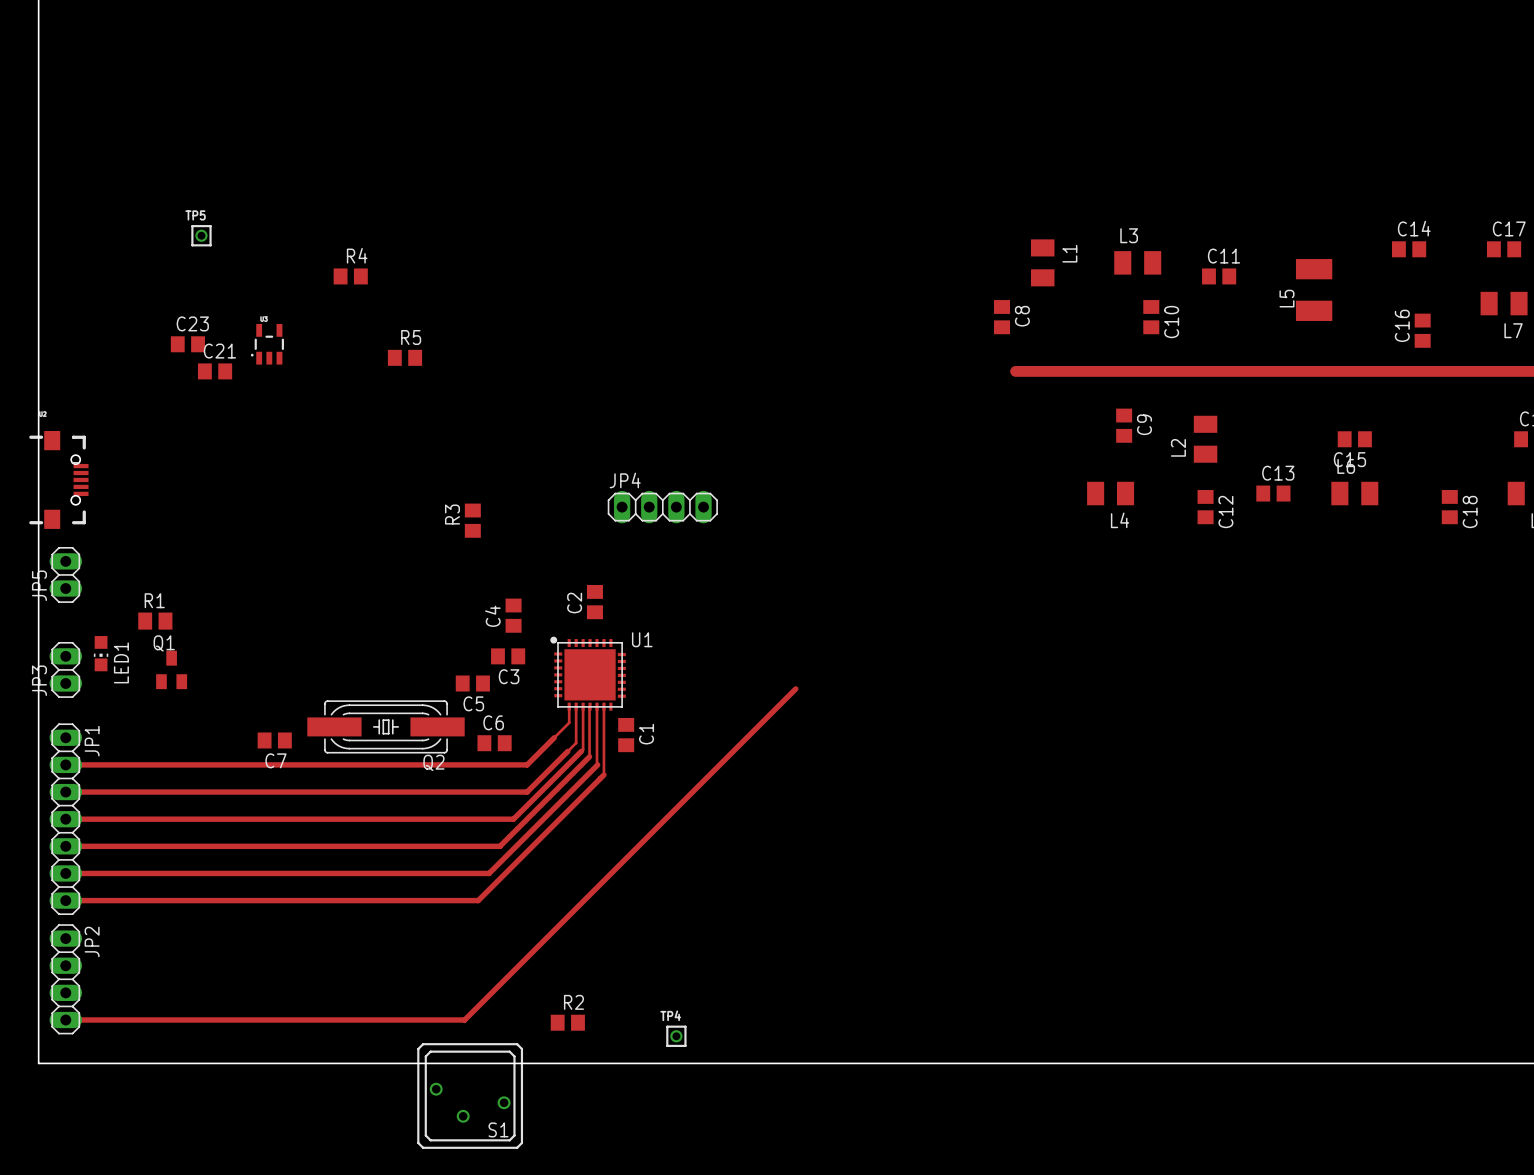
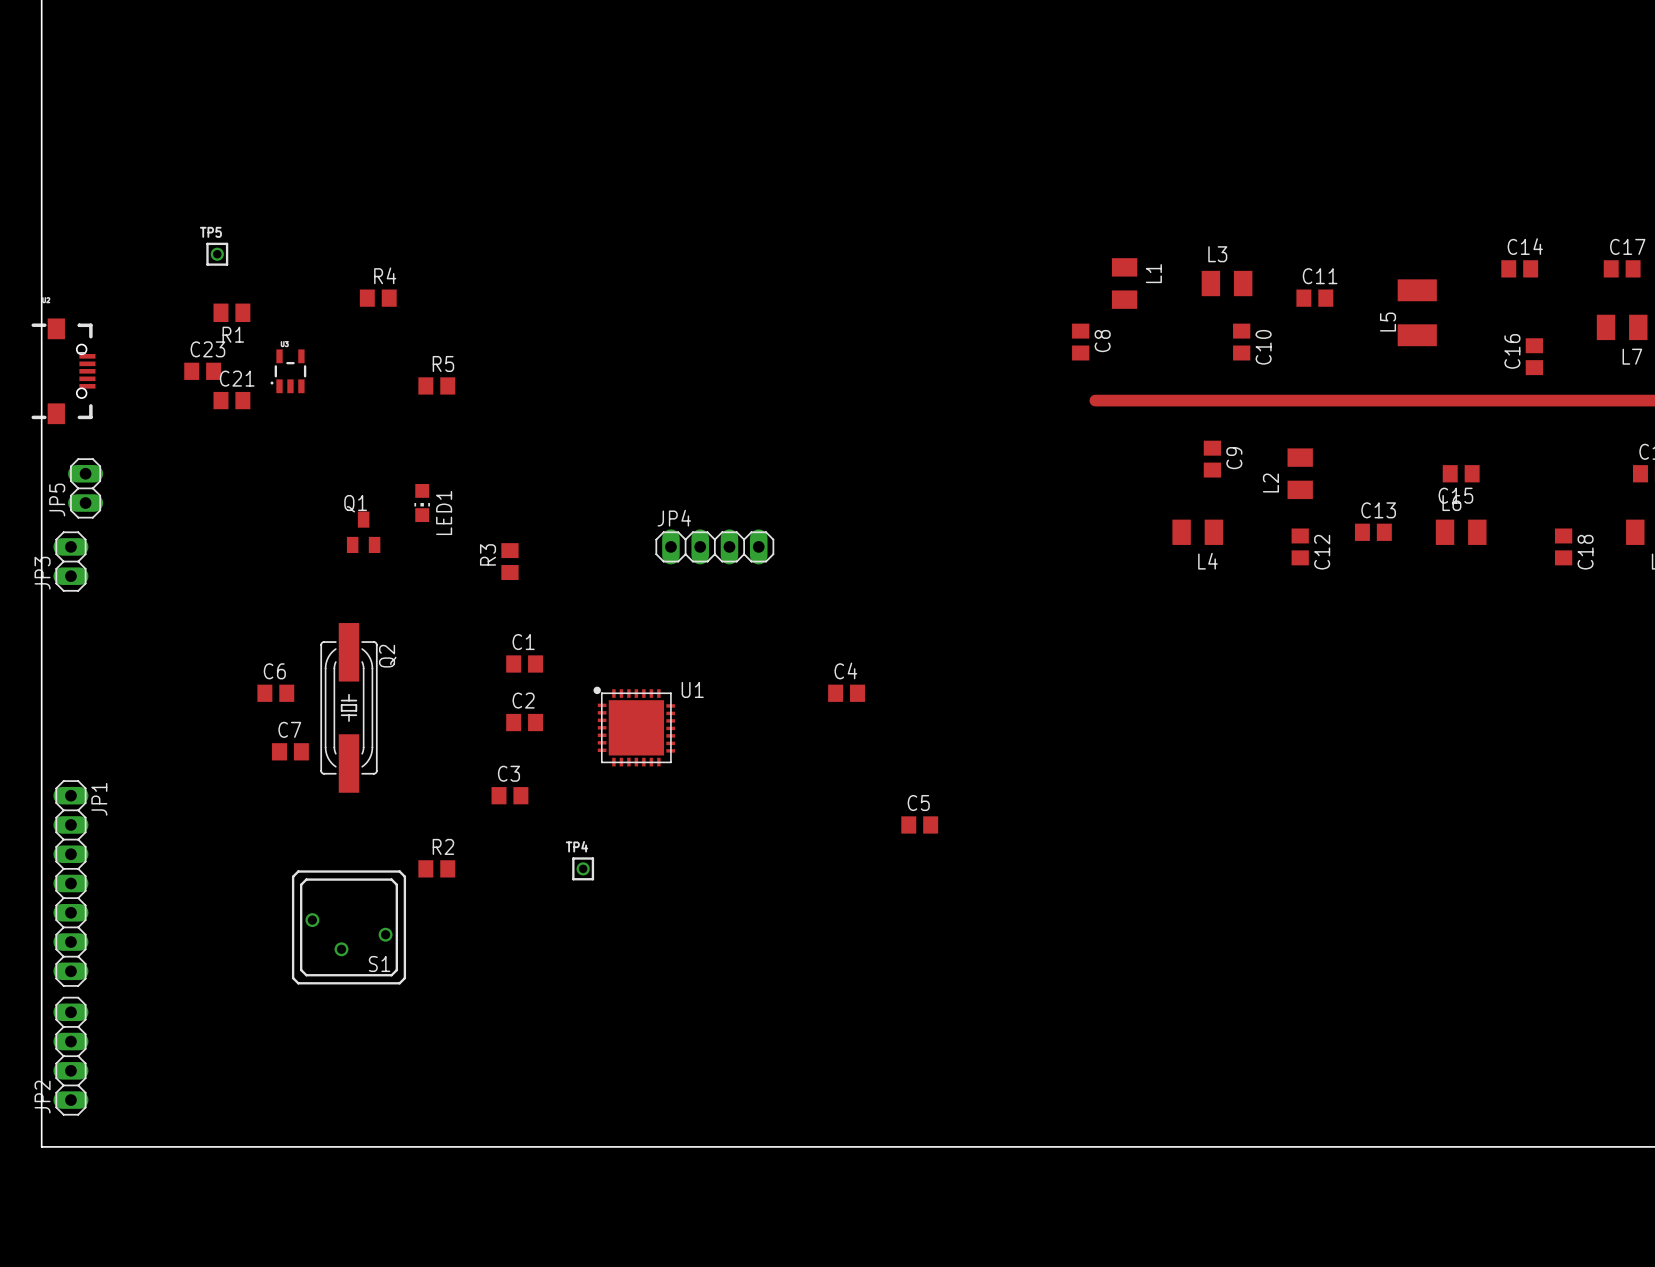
part position: (58, 479) -> (63, 371)
JP5 position: (65, 574) -> (85, 488)
R1 name position: R1 (154, 600) -> R1 (233, 334)
C2 rotation: 0° (594, 602) -> 90° clockwise (524, 722)
C2 position: (594, 602) -> (524, 722)
C4 rotation: 0° (513, 615) -> 90° clockwise (846, 693)
C4 position: (513, 615) -> (846, 693)
R1 position: (155, 621) -> (231, 312)
LED1 position: (101, 653) -> (422, 503)
C3 position: (508, 656) -> (509, 795)
JP3 position: (65, 669) -> (70, 561)
Q1 position: (171, 669) -> (363, 532)
C3 name position: C3 (509, 676) -> C3 (508, 773)
C5 position: (472, 683) -> (919, 824)
track: (795, 688) (464, 1020) (65, 1020) -> none
C5 name position: C5 (473, 703) -> C5 (918, 803)
track: (569, 706) (569, 722) (527, 764) (65, 764) -> none
track: (576, 706) (576, 743) (527, 792) (65, 792) -> none
track: (583, 706) (583, 749) (513, 819) (65, 819) -> none
track: (590, 706) (589, 756) (499, 846) (65, 846) -> none
track: (597, 706) (597, 764) (489, 873) (65, 873) -> none
track: (603, 706) (603, 774) (478, 900) (65, 900) -> none
Q2 rotation: 0° (386, 726) -> 90° clockwise (349, 707)
C1 name position: C1 (646, 734) -> C1 (523, 642)
C1 rotation: 0° (626, 735) -> 90° clockwise (524, 663)
C1 position: (626, 735) -> (524, 663)
C7 position: (274, 740) -> (290, 751)
C6 position: (494, 743) -> (275, 693)
C7 name position: C7 (275, 760) -> C7 (289, 729)
Q2 name position: Q2 (433, 762) -> Q2 (387, 656)
JP2 name position: JP2 (92, 941) -> JP2 (42, 1097)
R2 position: (567, 1022) -> (436, 868)
TP4 position: (676, 1036) -> (583, 868)
S1 position: (470, 1095) -> (349, 927)

